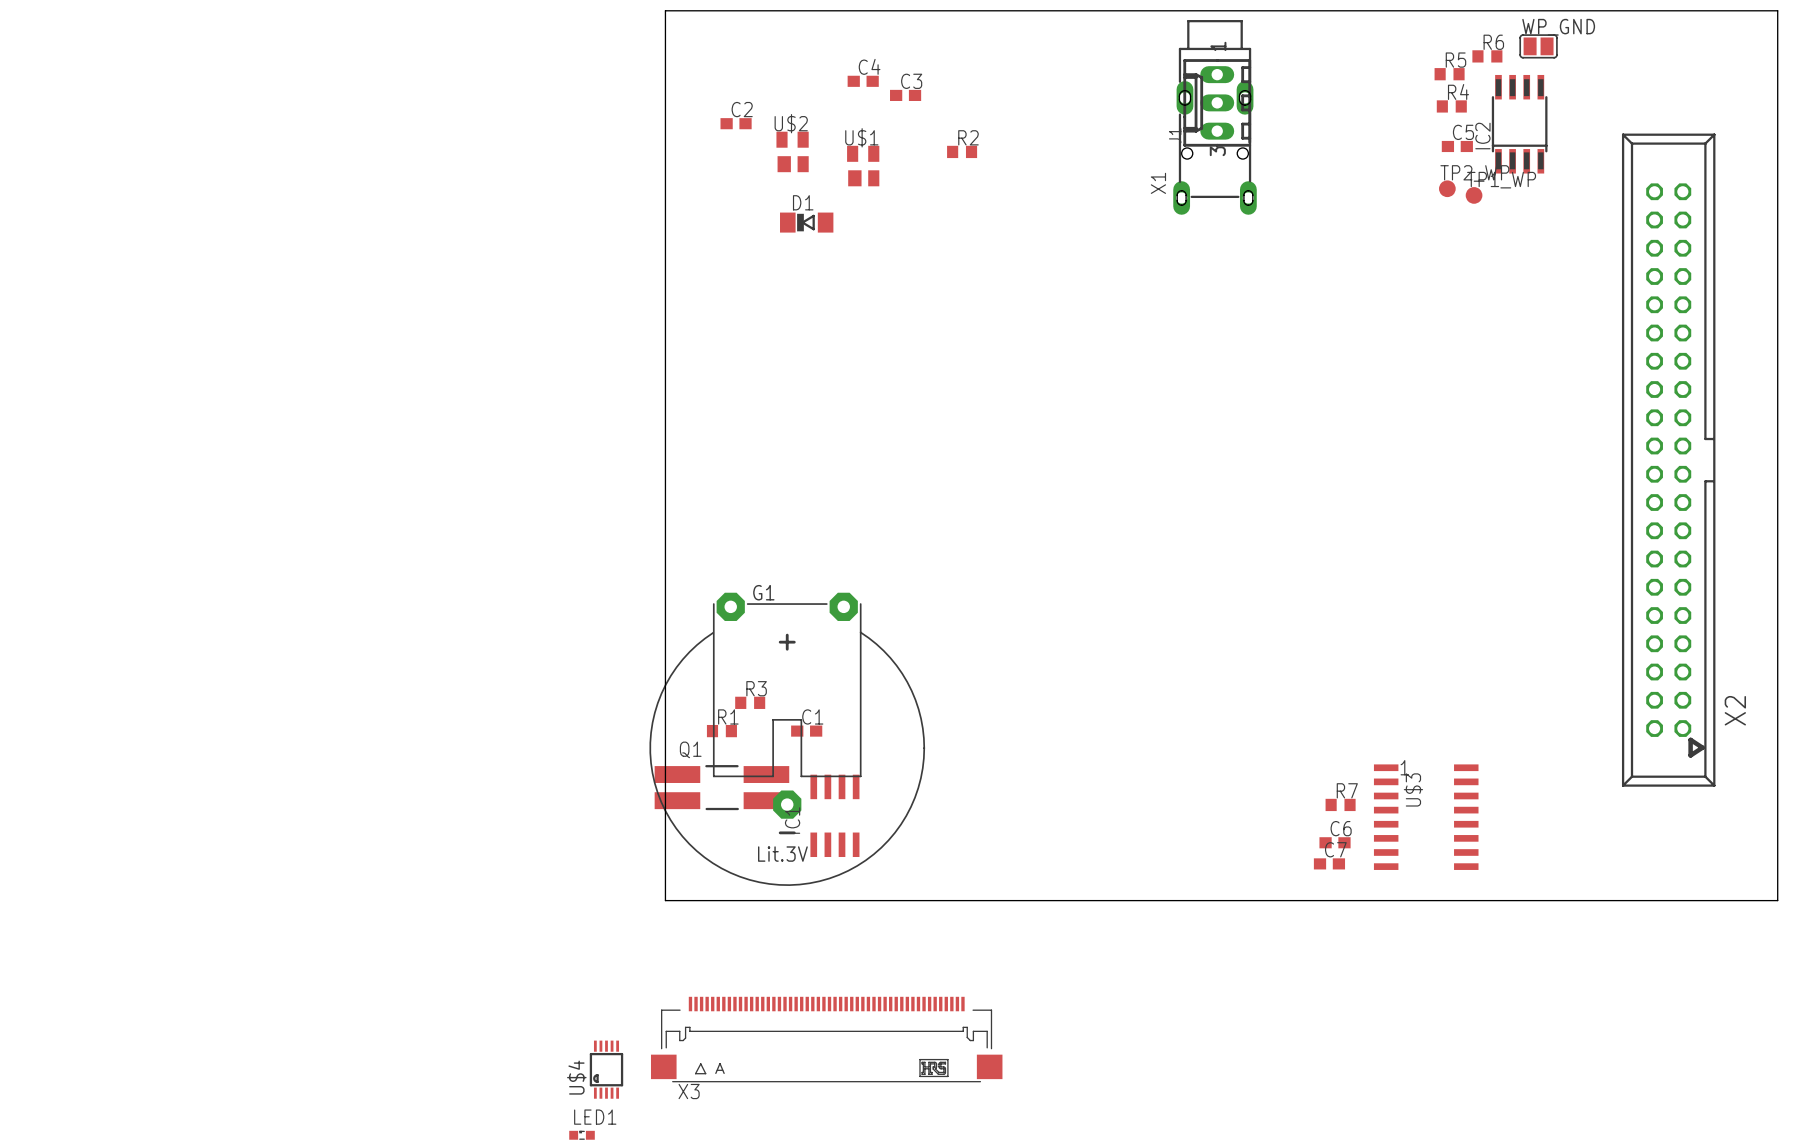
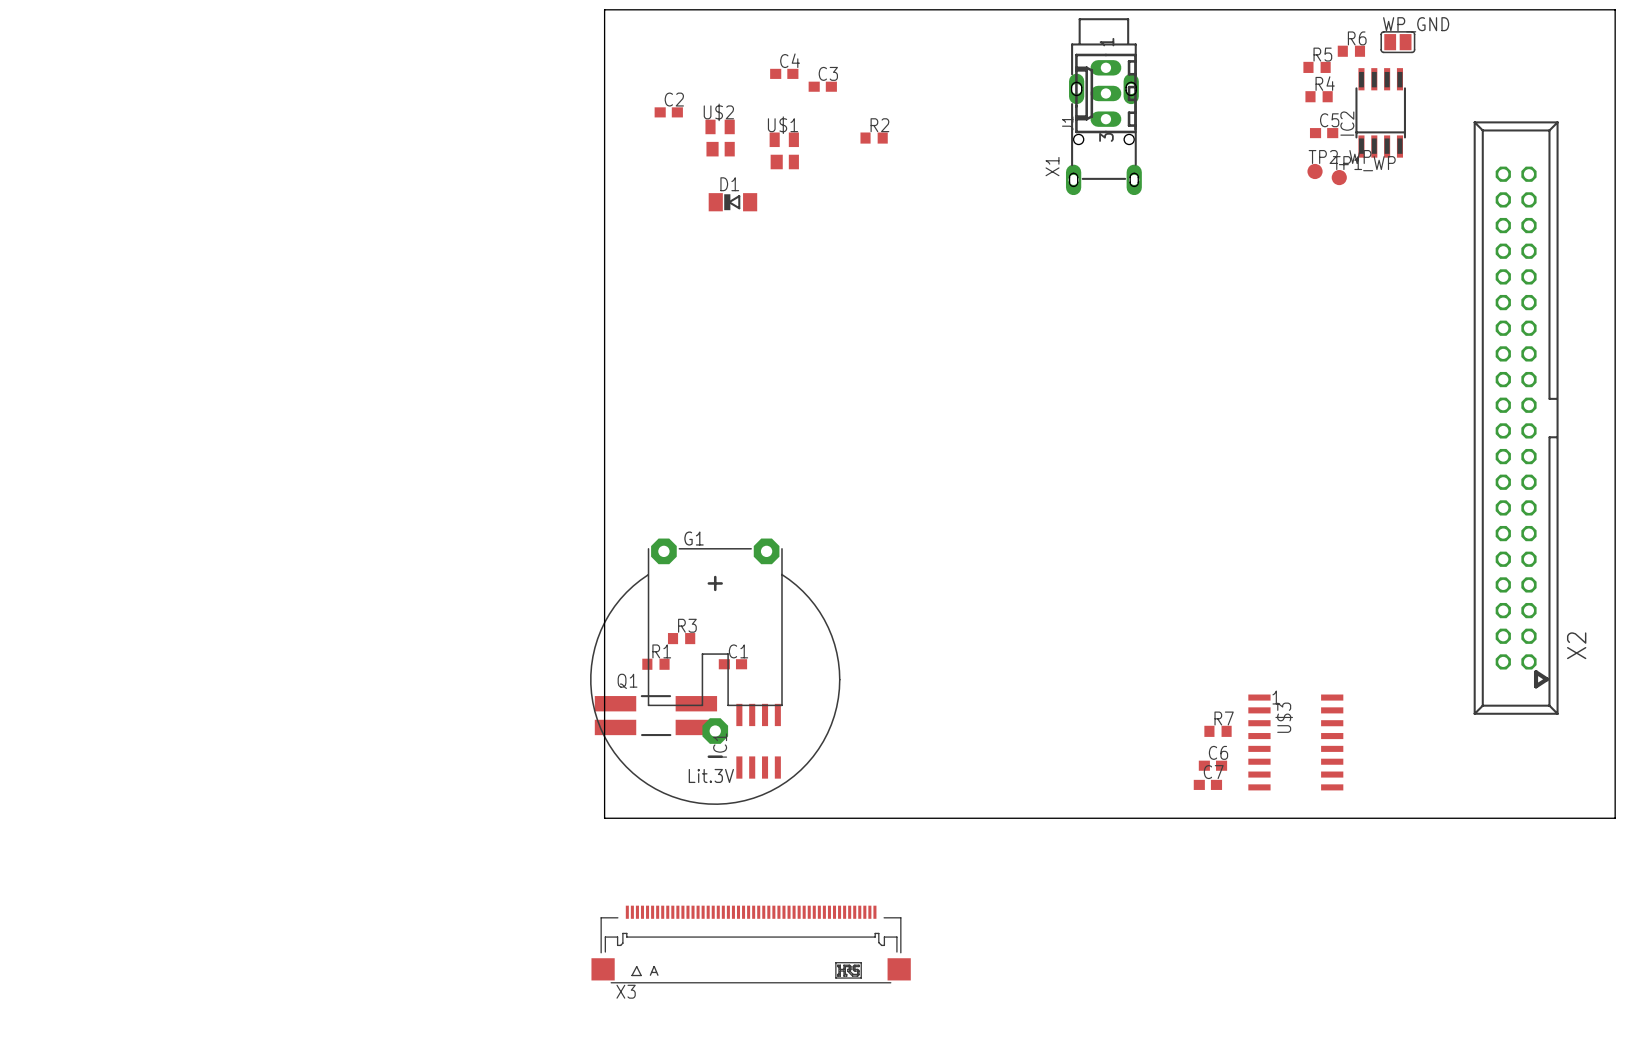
U$4: (606, 1069) -> none
LED1: (582, 1135) -> none

